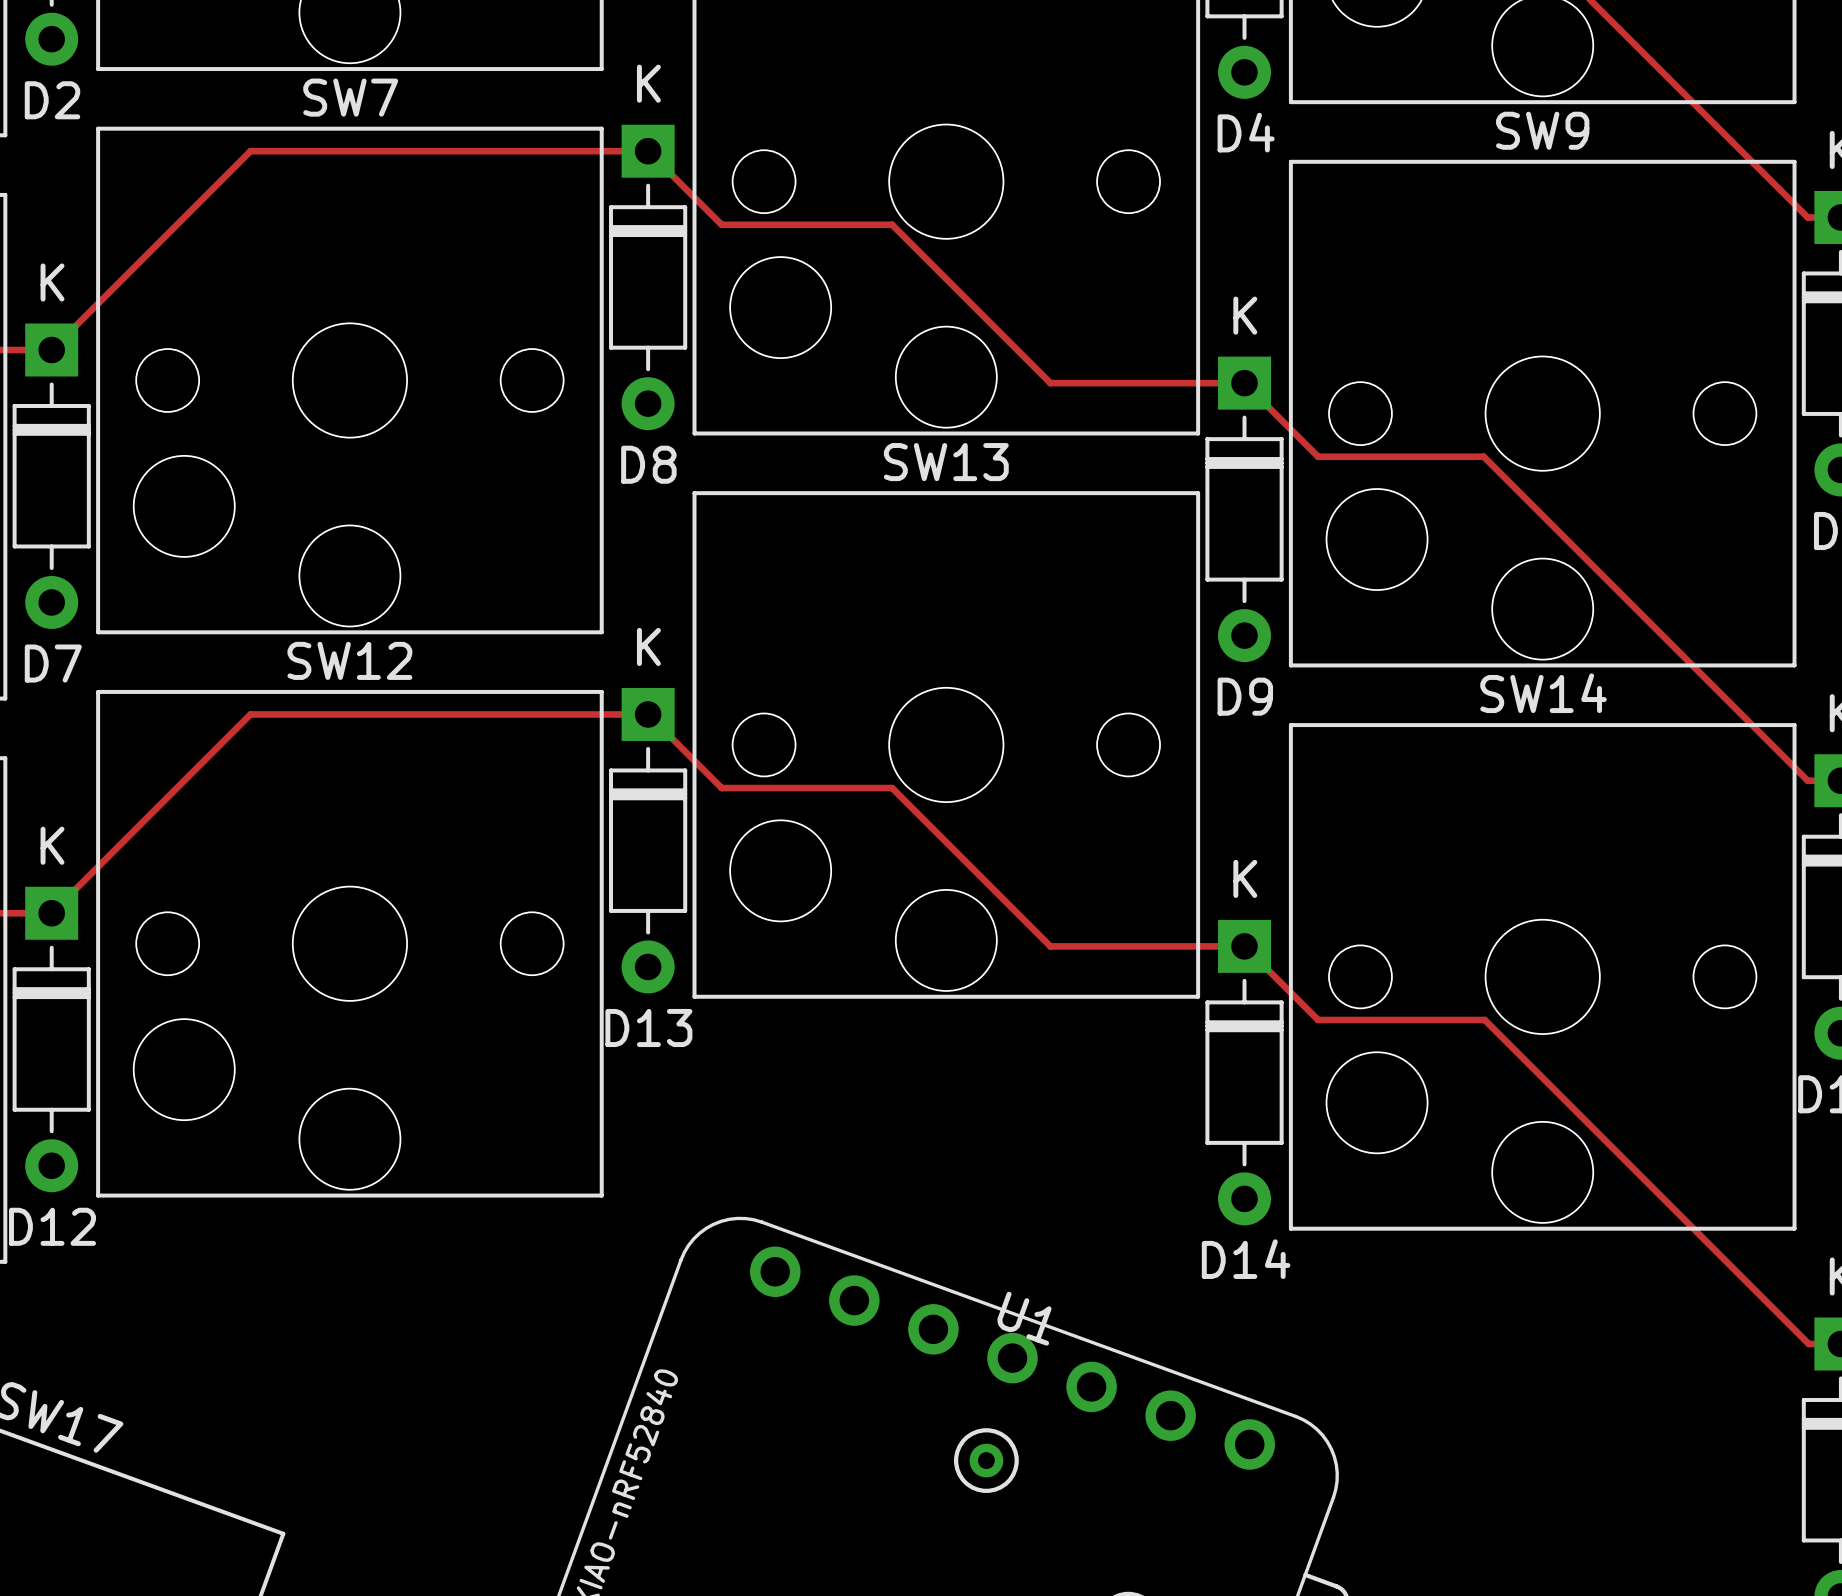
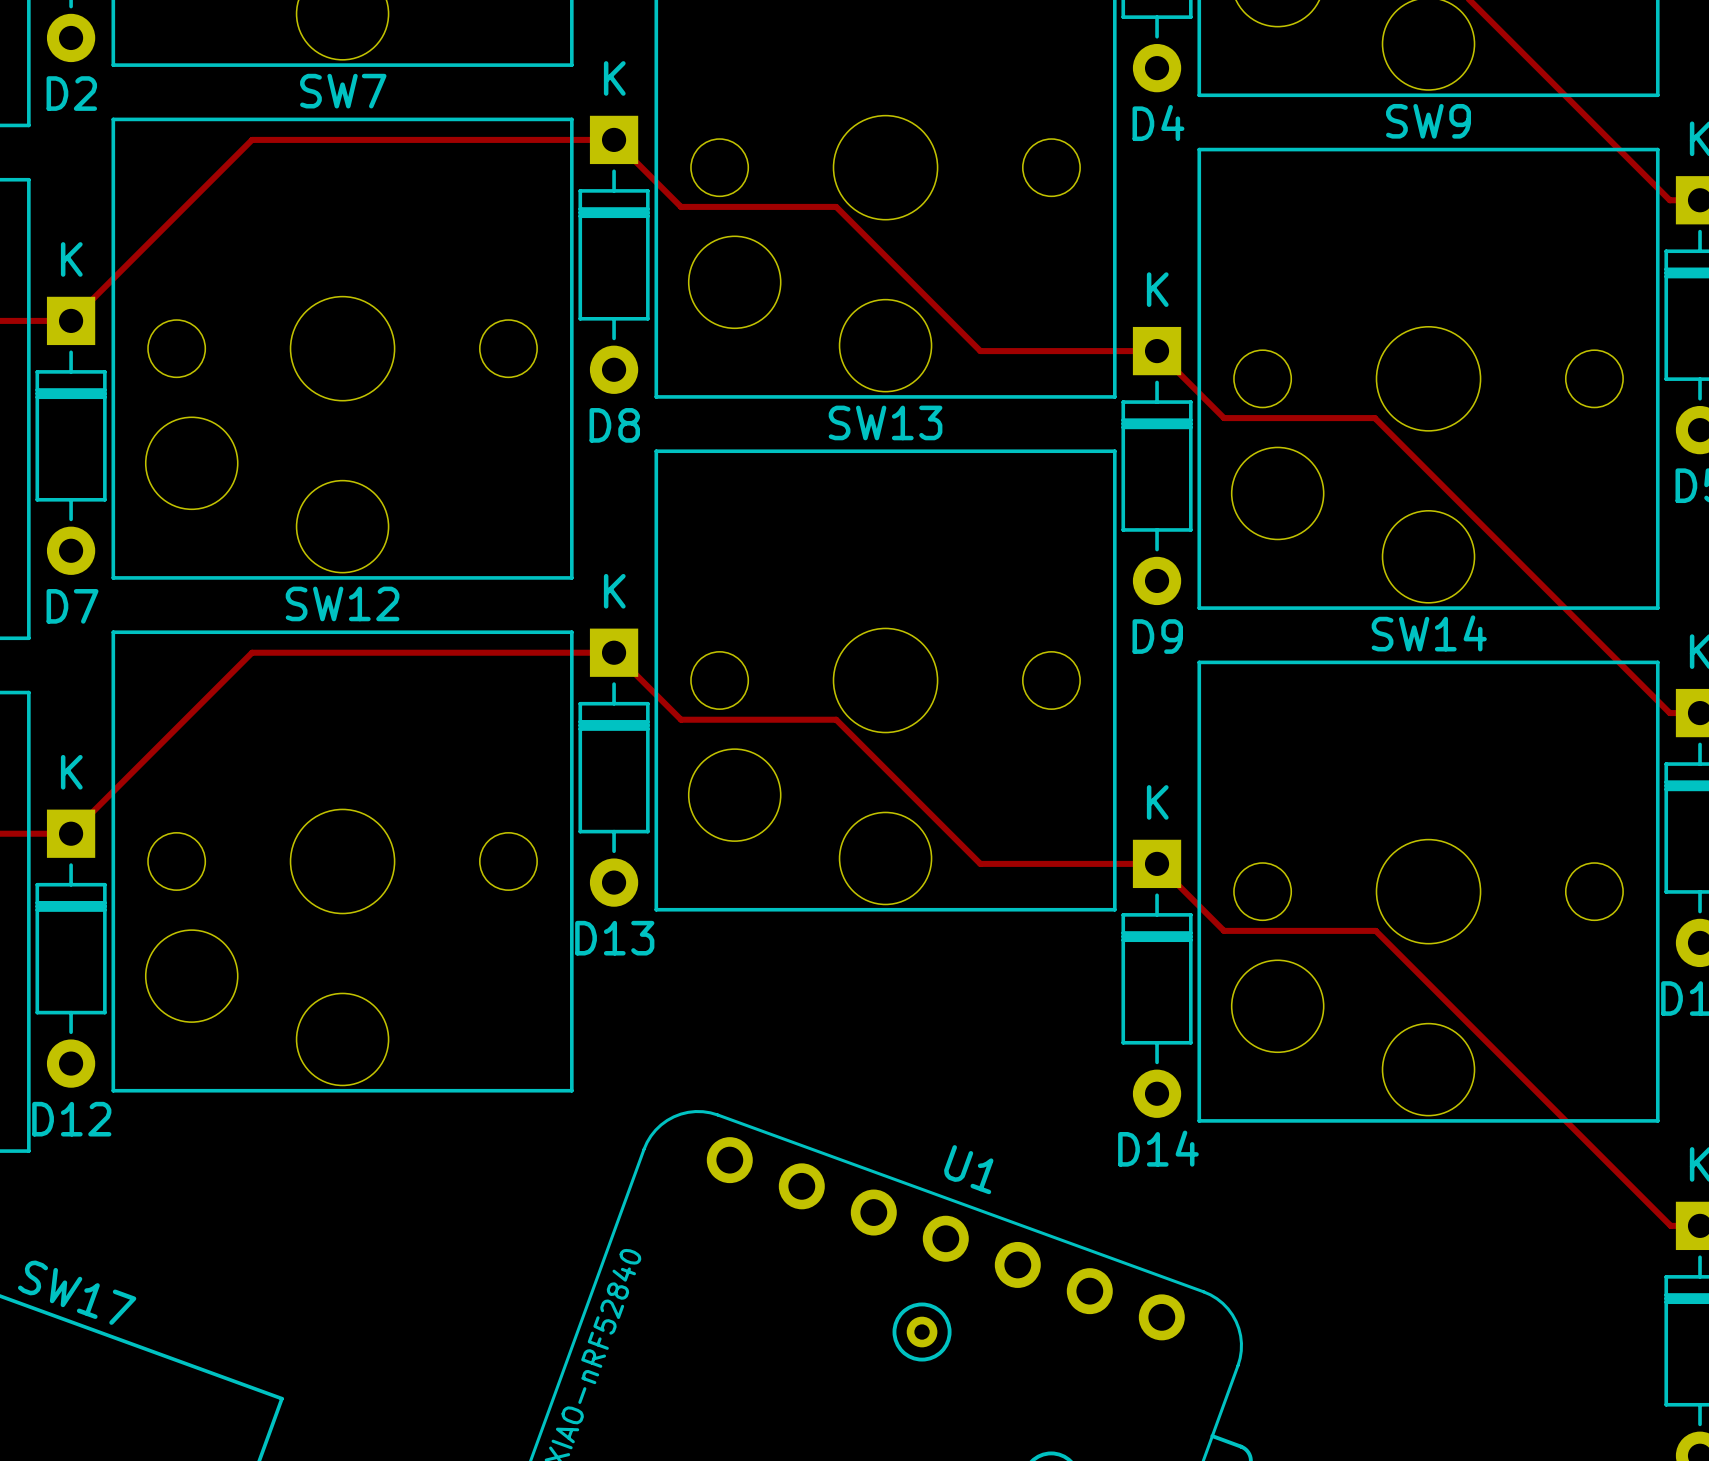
U1 name position: U1 (1024, 1318) -> U1 (968, 1169)

